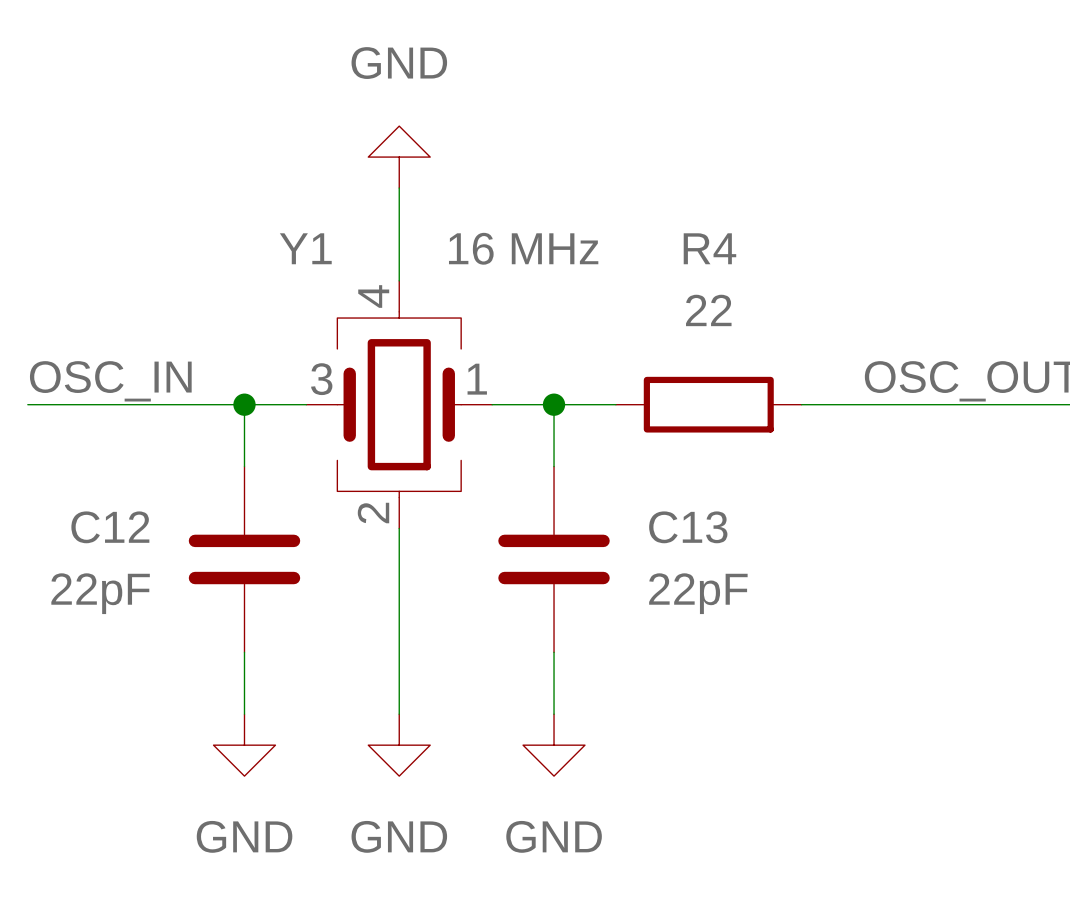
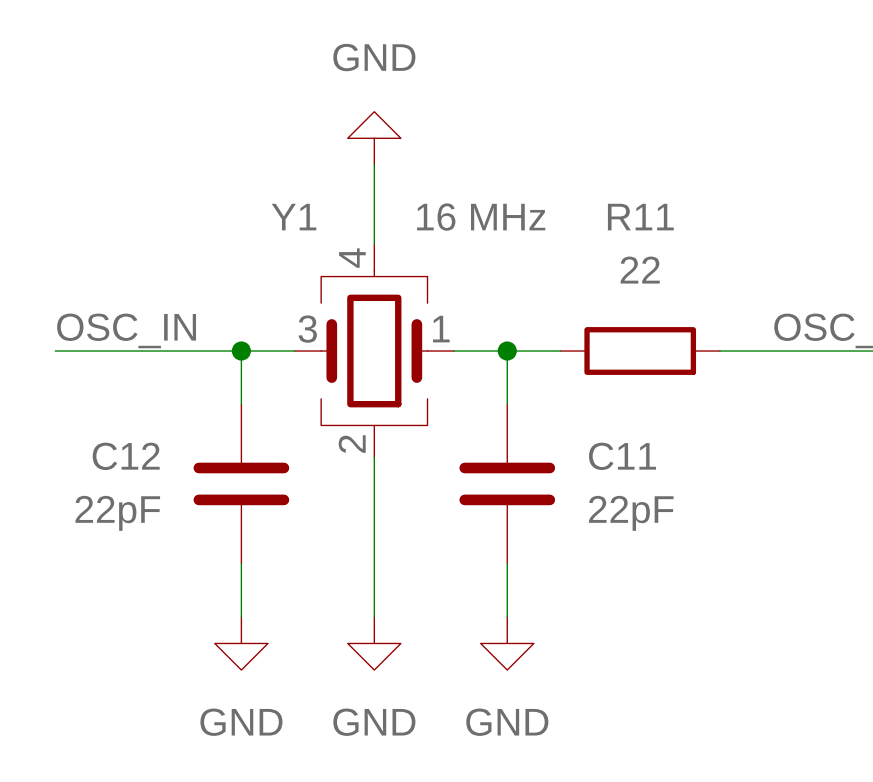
R4 name: R4 (709, 248) -> R11 (640, 217)
C13 name: C13 (688, 527) -> C11 (622, 456)

